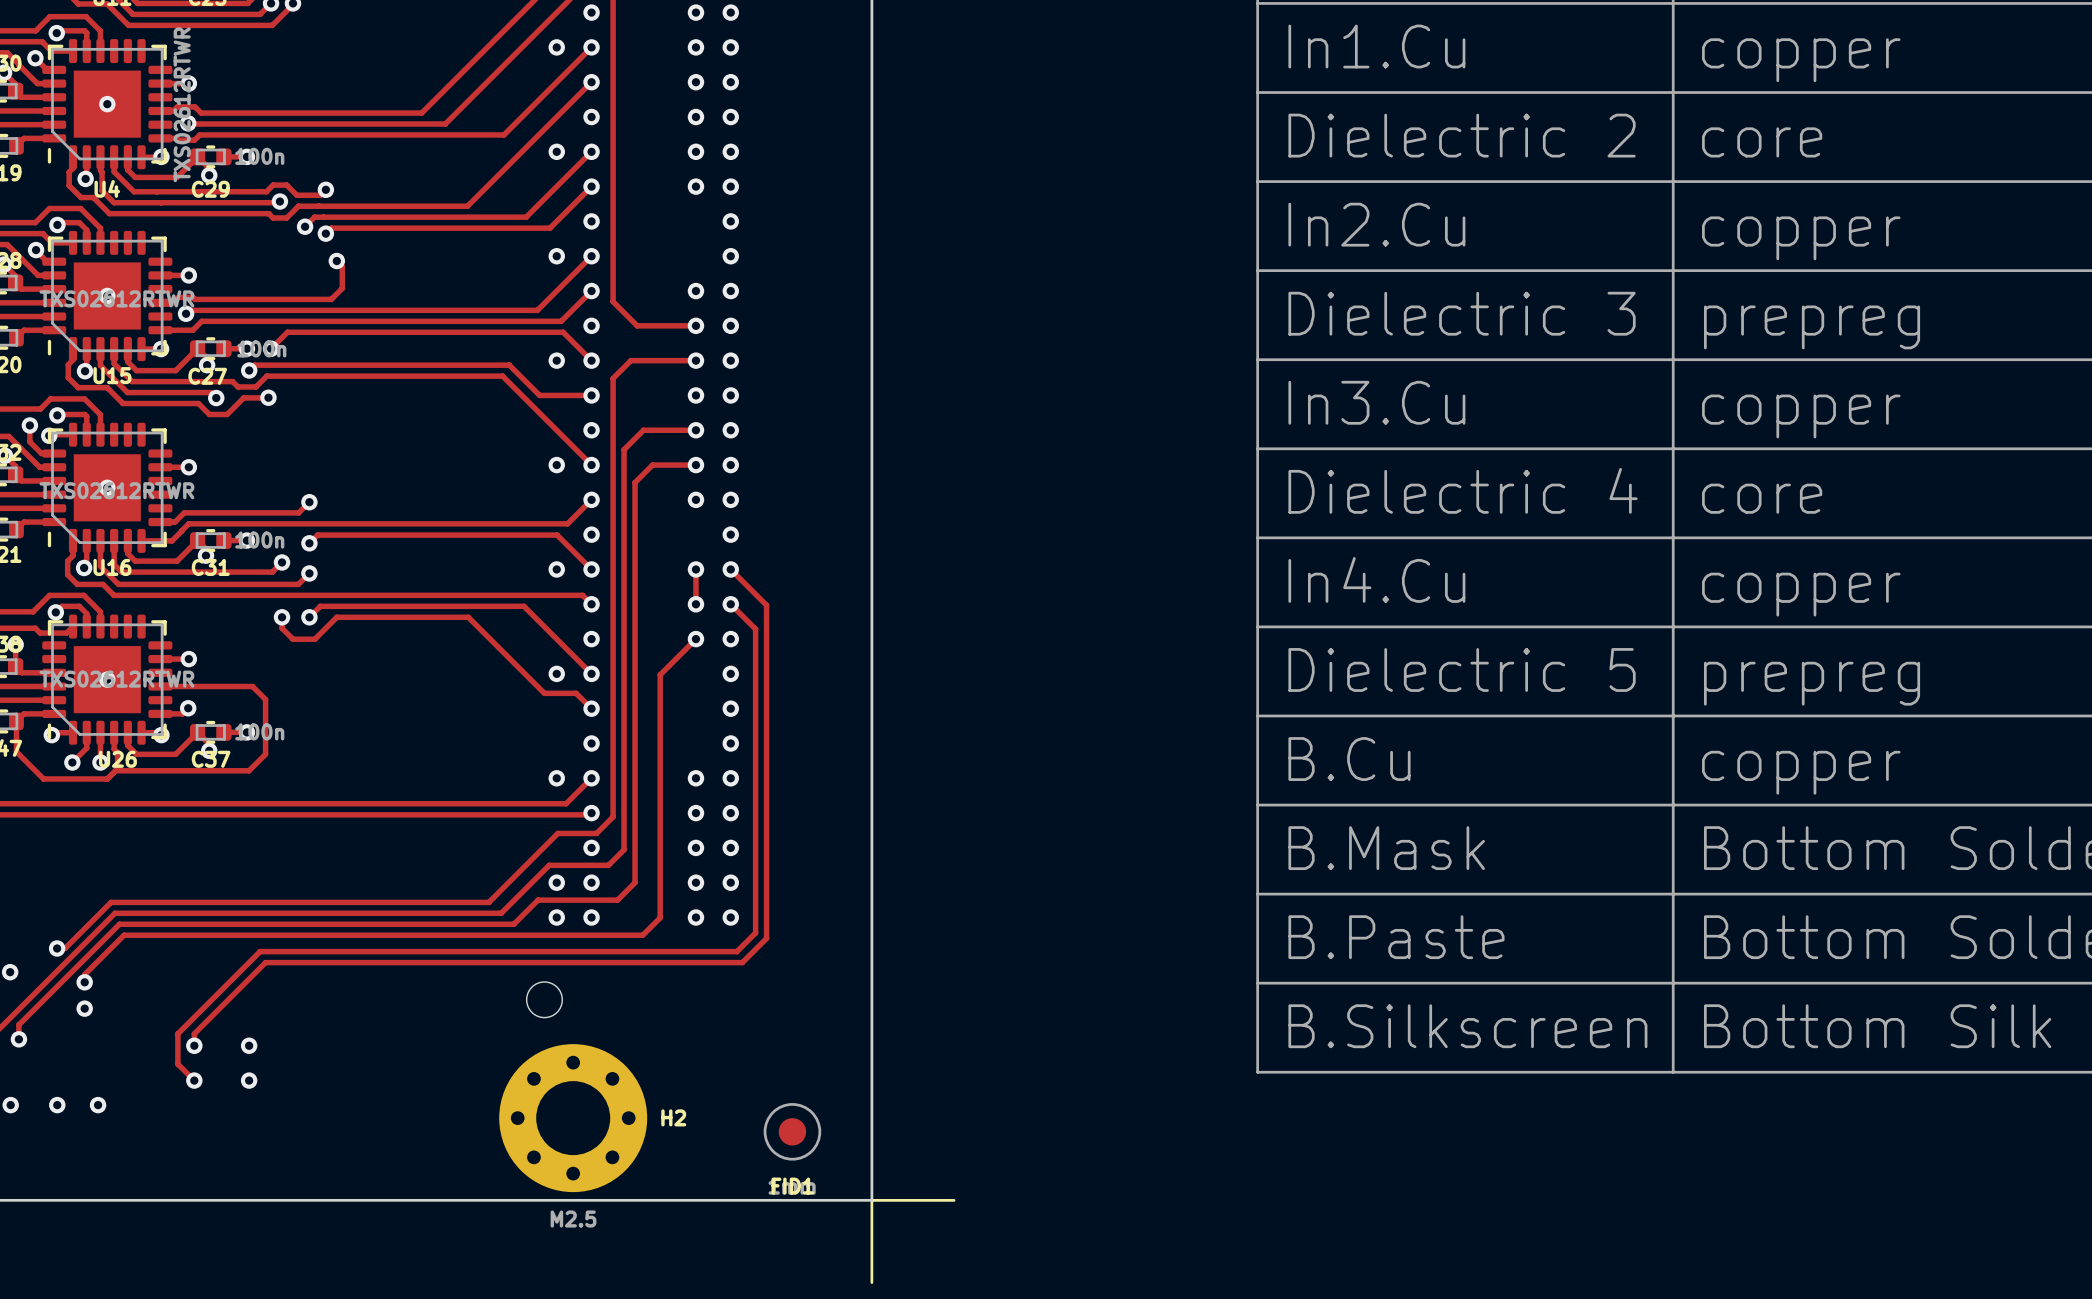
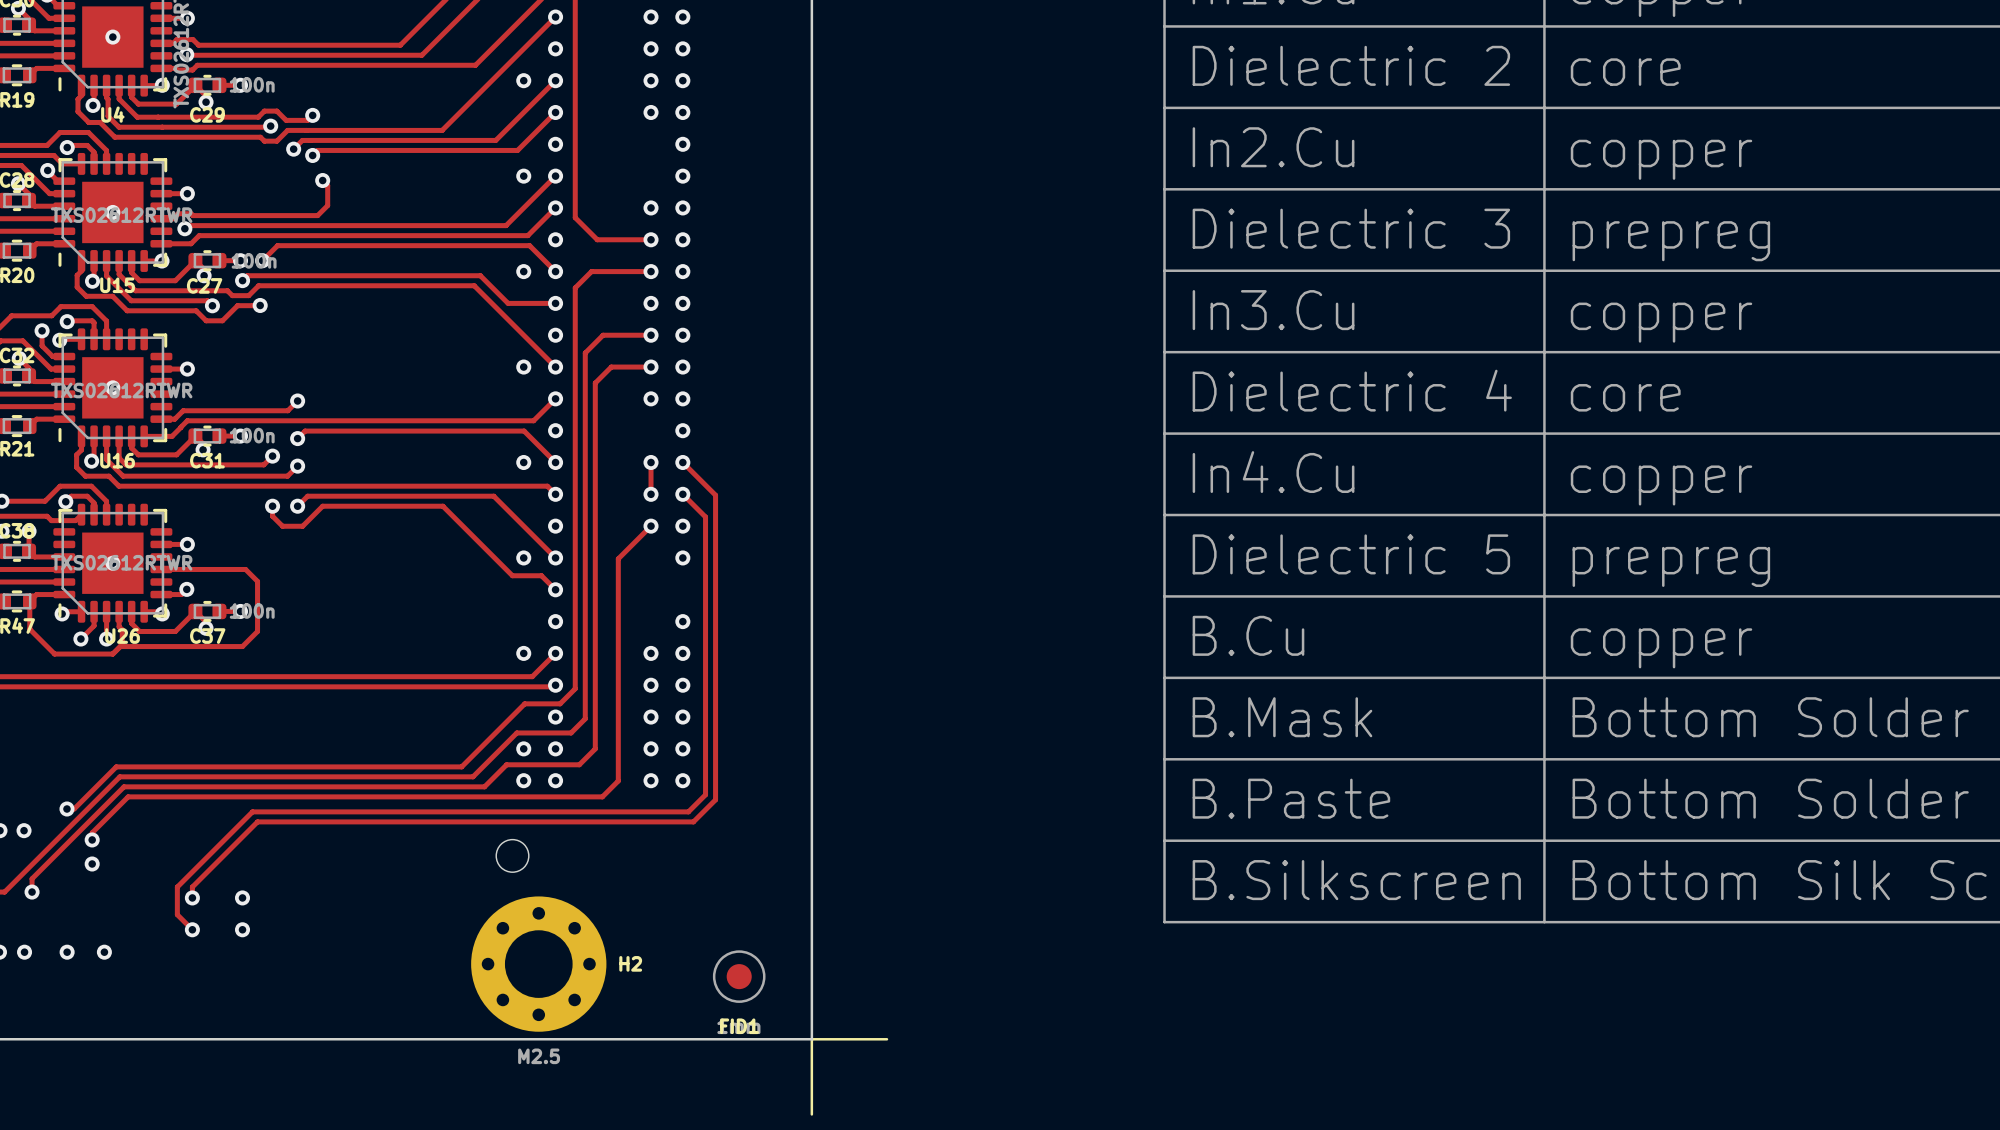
via: (730, 708) -> none

